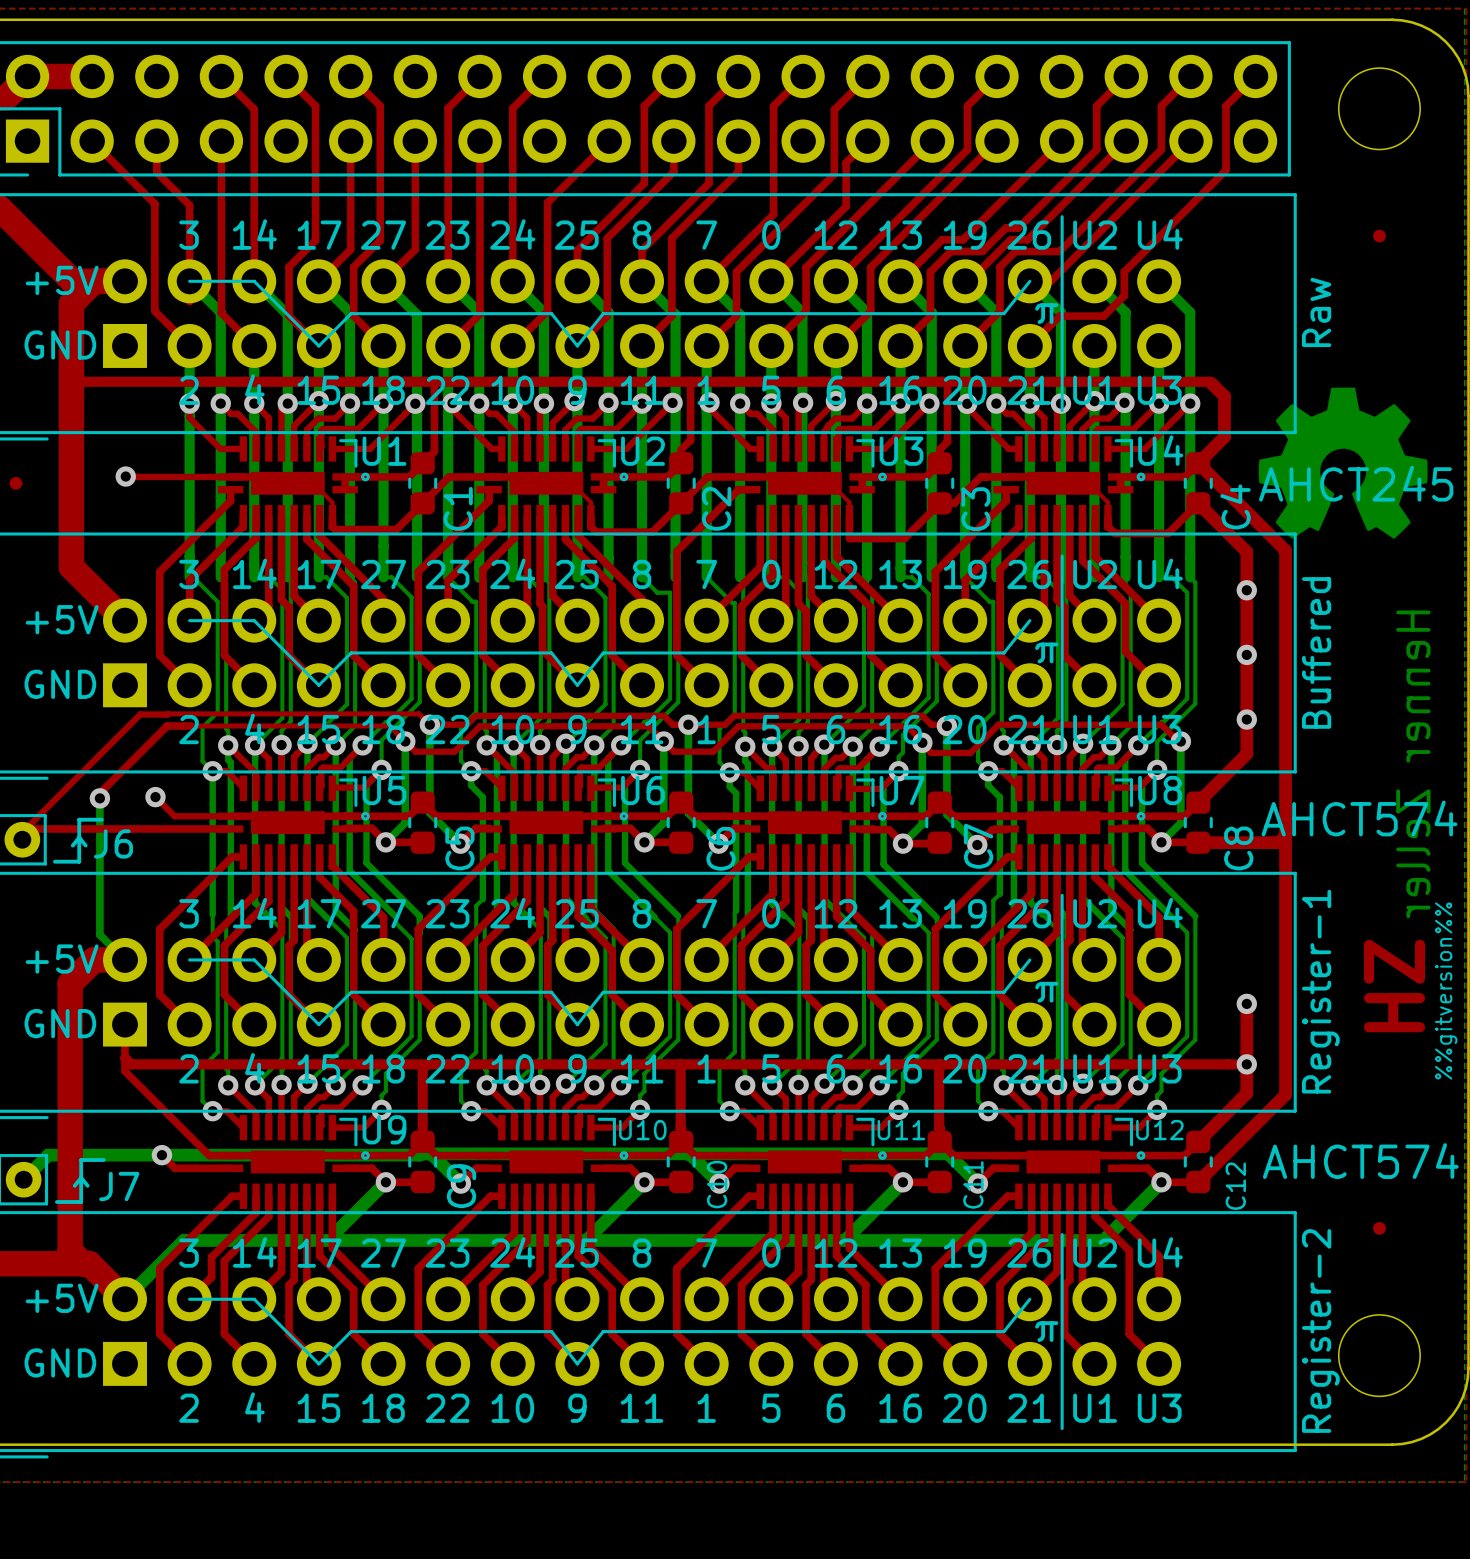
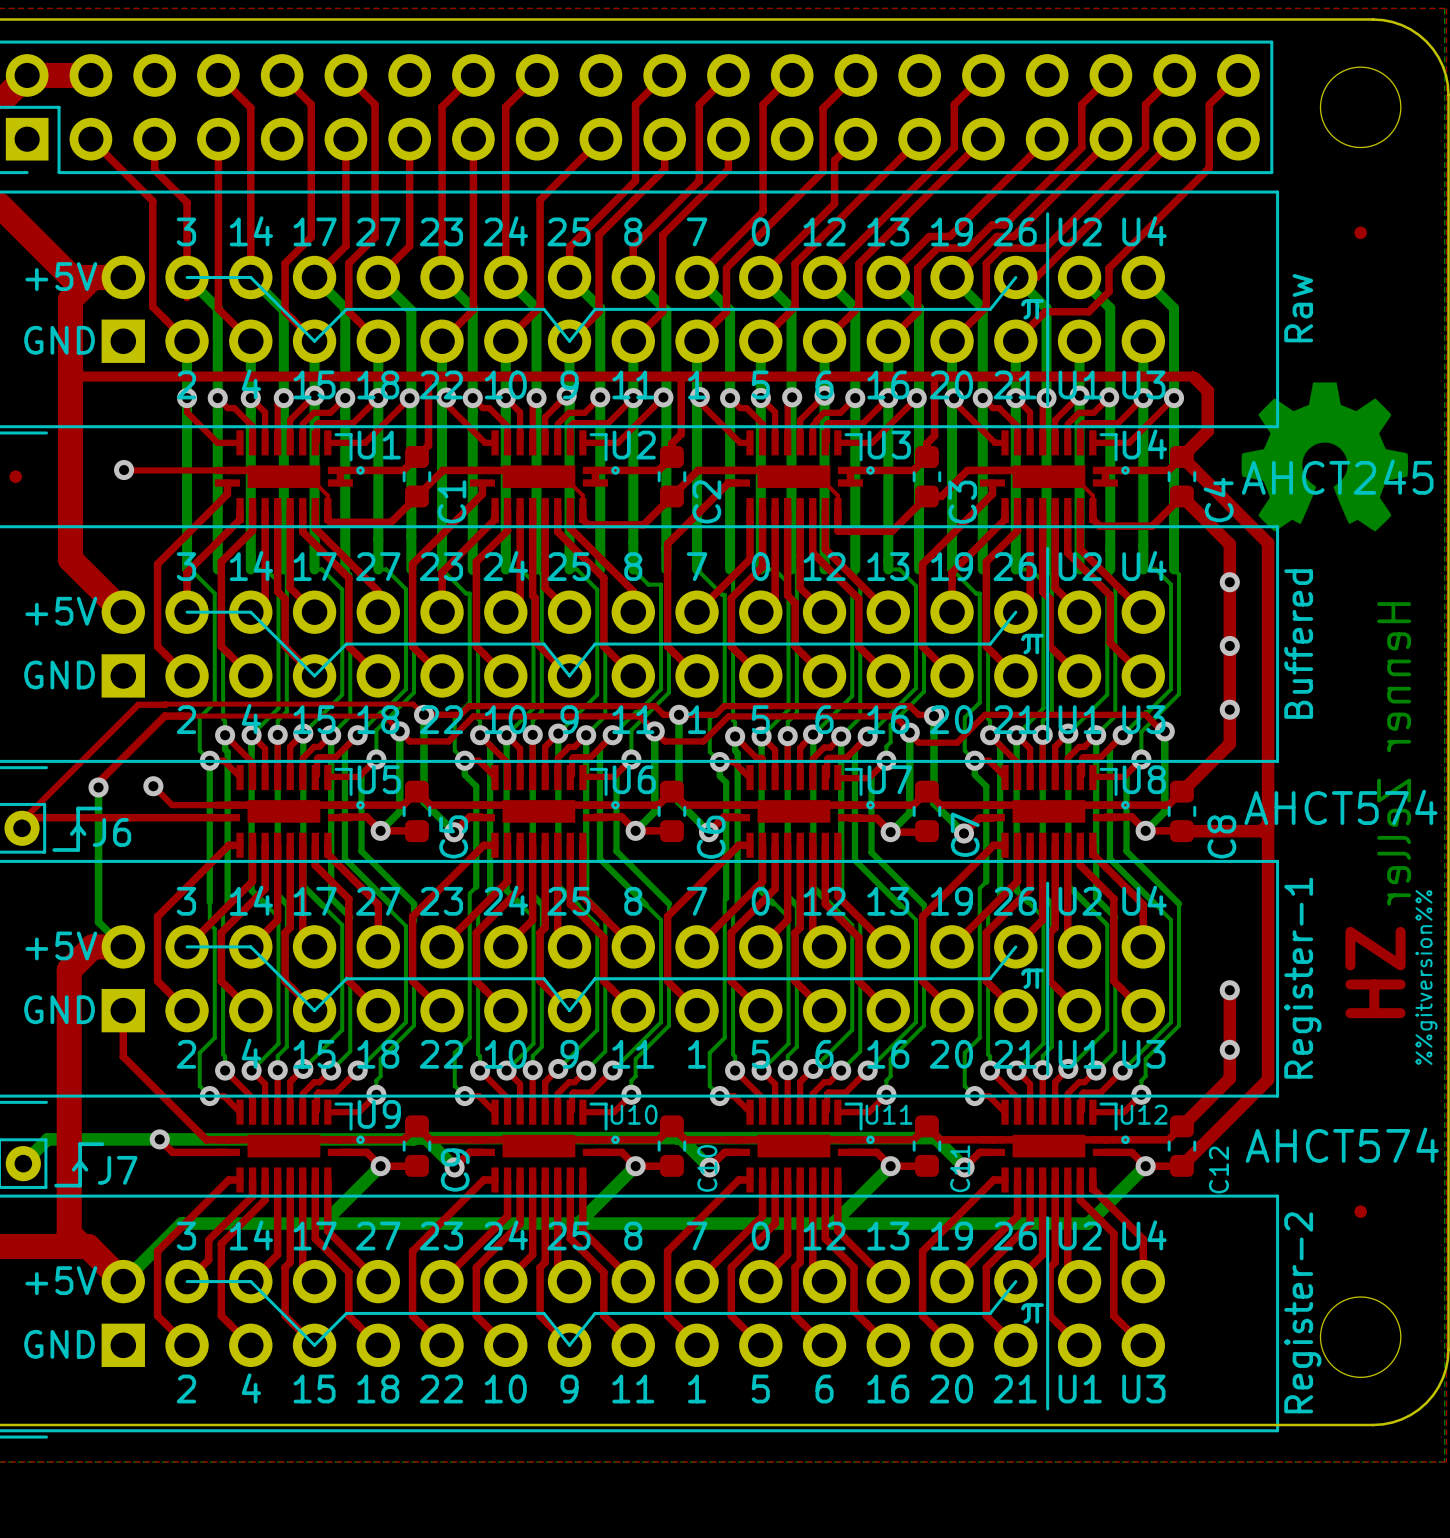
top track: (125, 1058) (131, 1064) (1246, 1064) -> none
top track: (427, 1064) (422, 1068) (422, 1141) -> none
top track: (680, 1064) (681, 1141) -> none
top track: (939, 1064) (939, 1141) -> none

